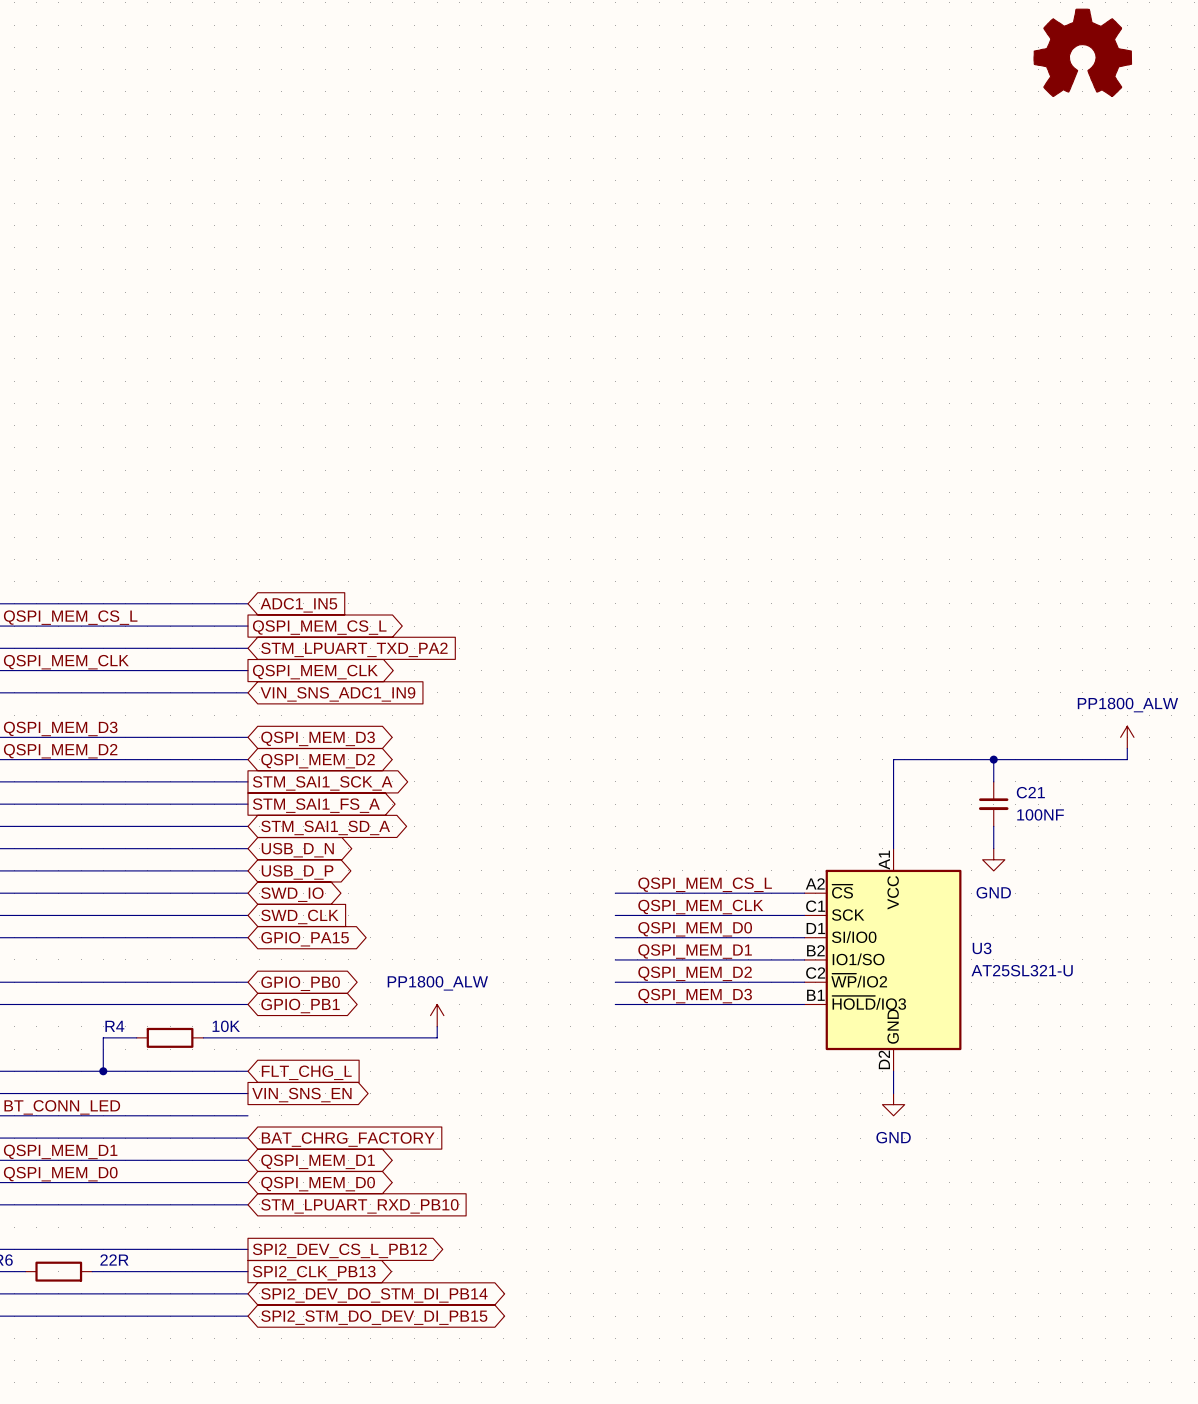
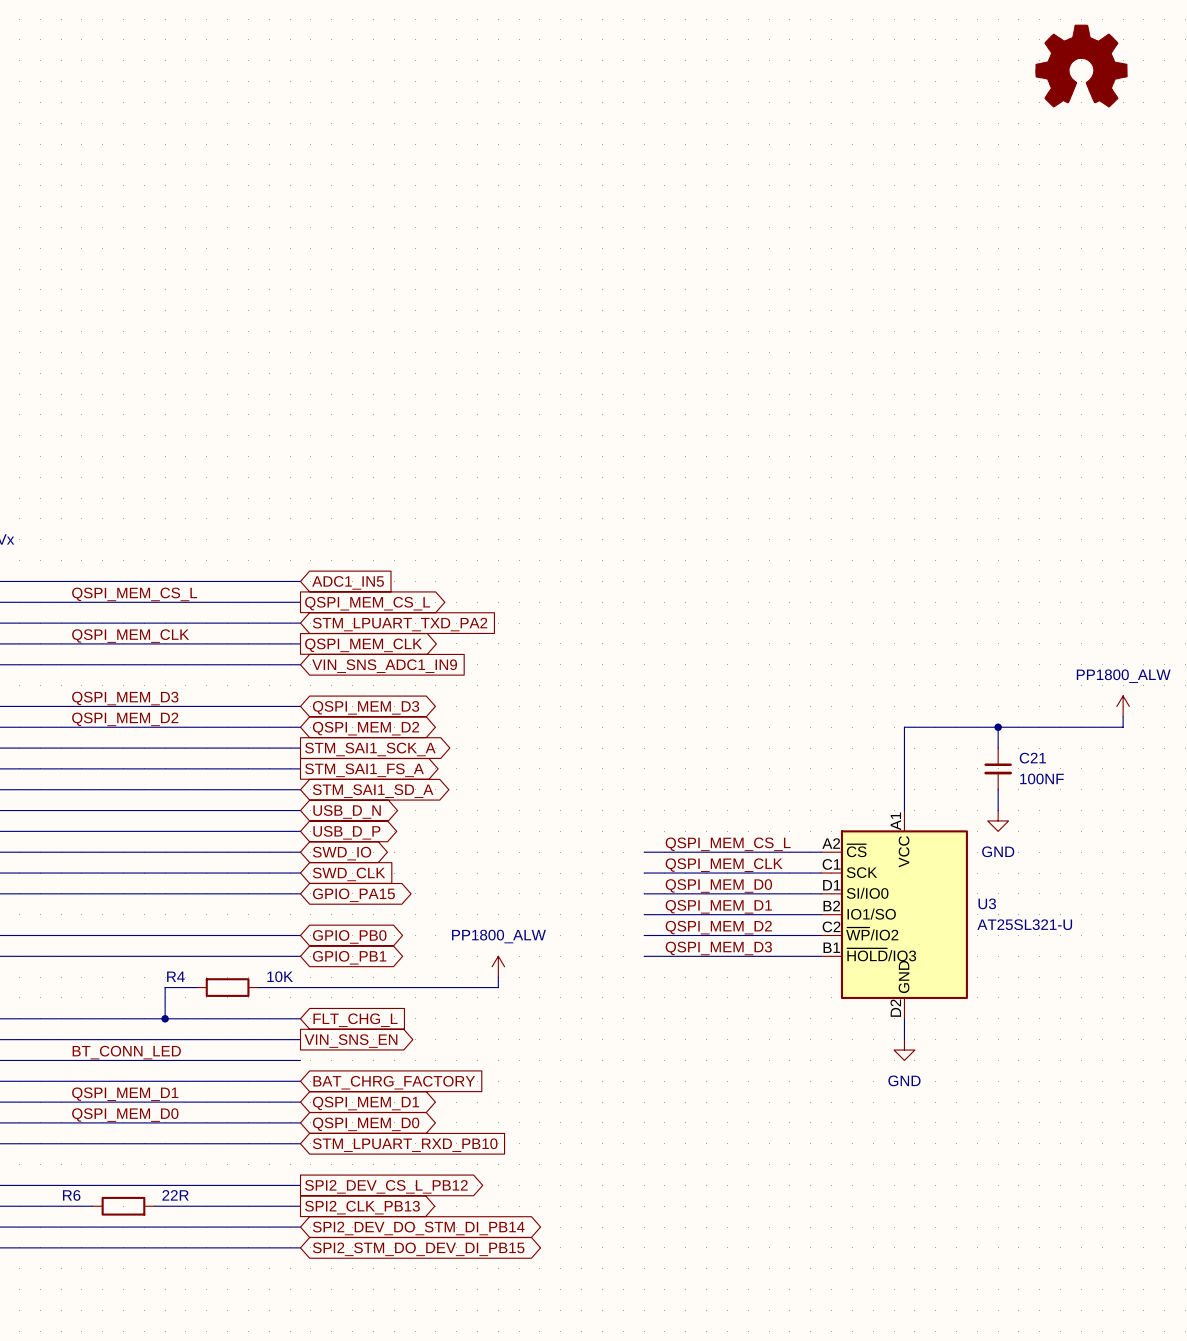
power symbol position: PP1800_ALW (437, 1015) -> PP1800_ALW (498, 966)
wire: (437, 1026) (437, 1037) -> (498, 977) (498, 987) (477, 987)

